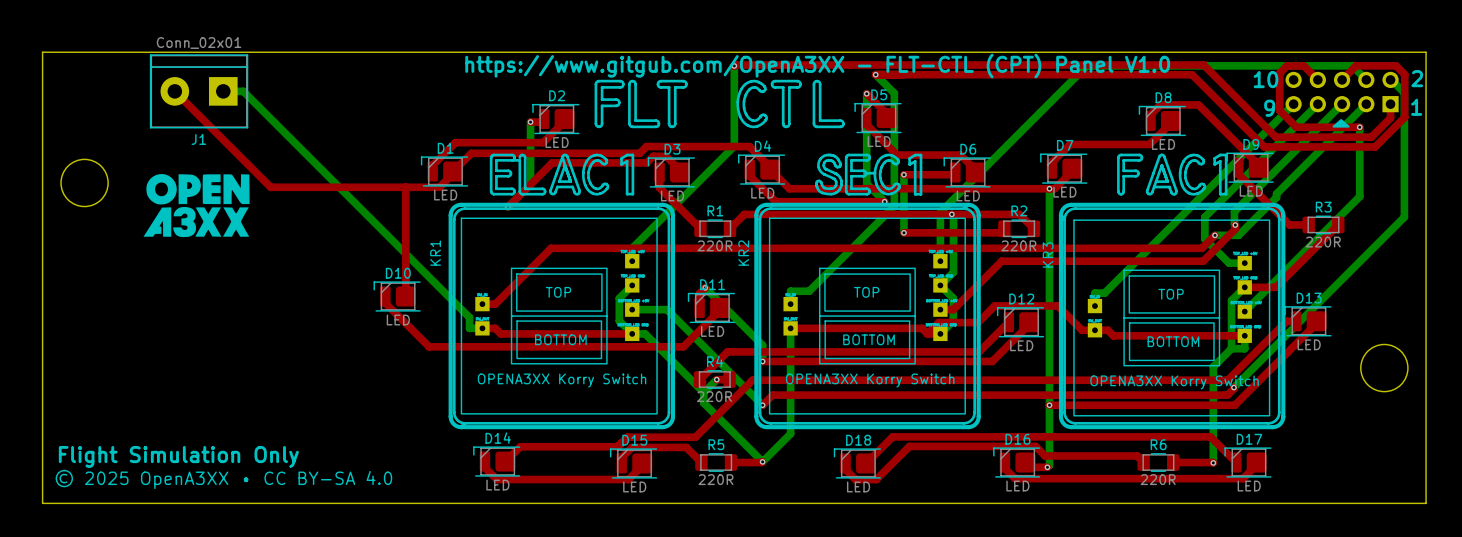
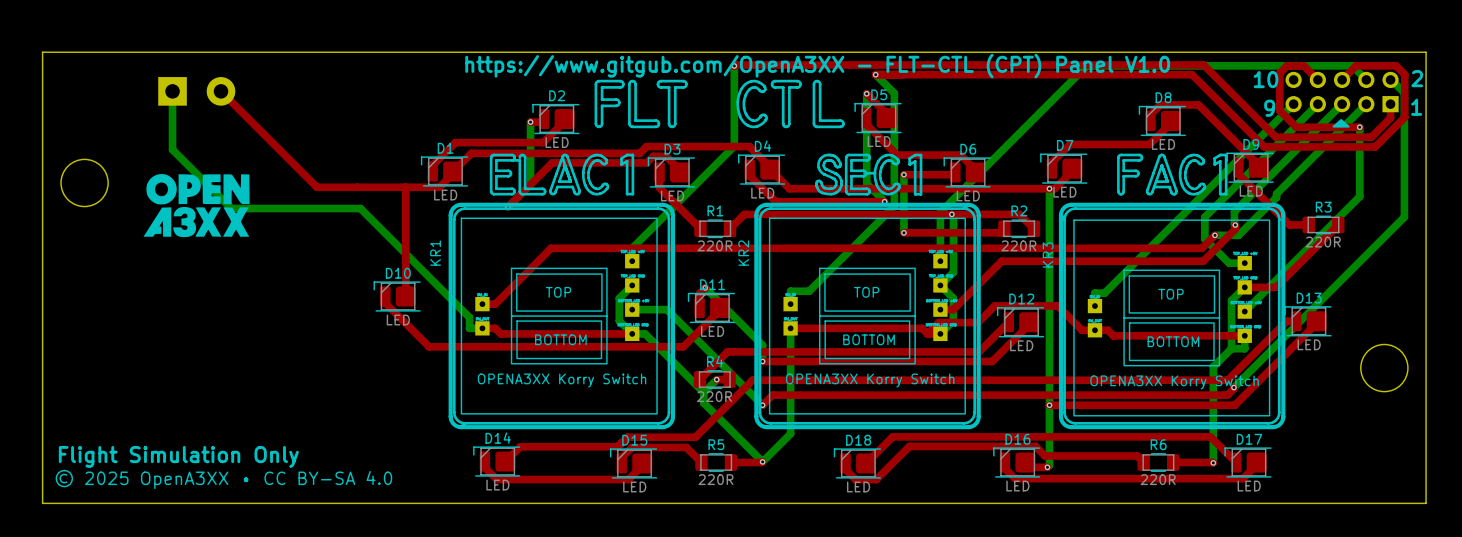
top track: (174, 91) (270, 187) (316, 187) -> (221, 91) (316, 187)
J1 side: top (199, 91) -> bottom (196, 91)
bottom track: (223, 91) (243, 91) (360, 208) -> (172, 91) (172, 149) (231, 208) (360, 208)

